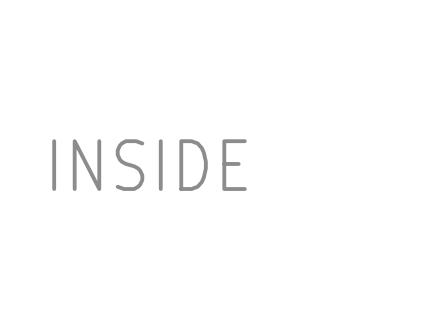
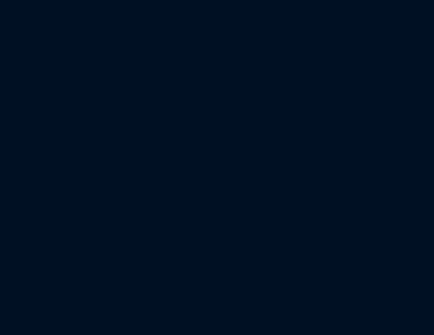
text: INSIDE (149, 165) -> none

